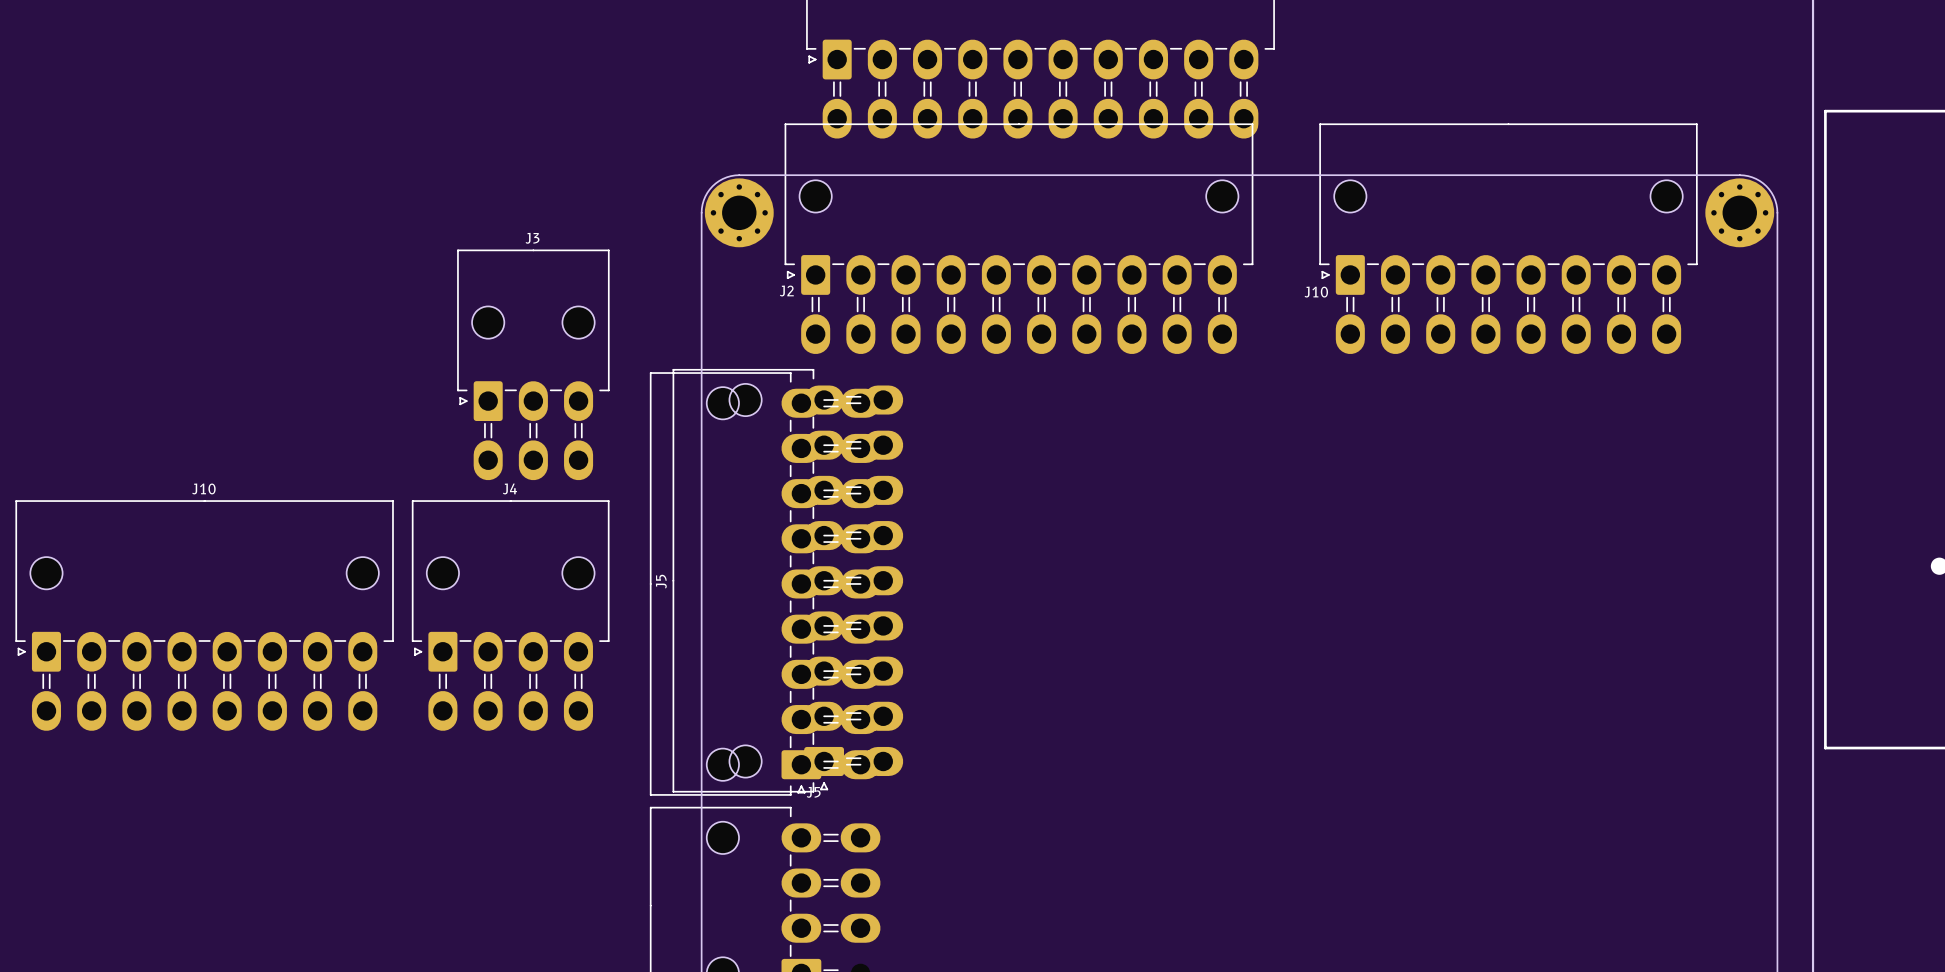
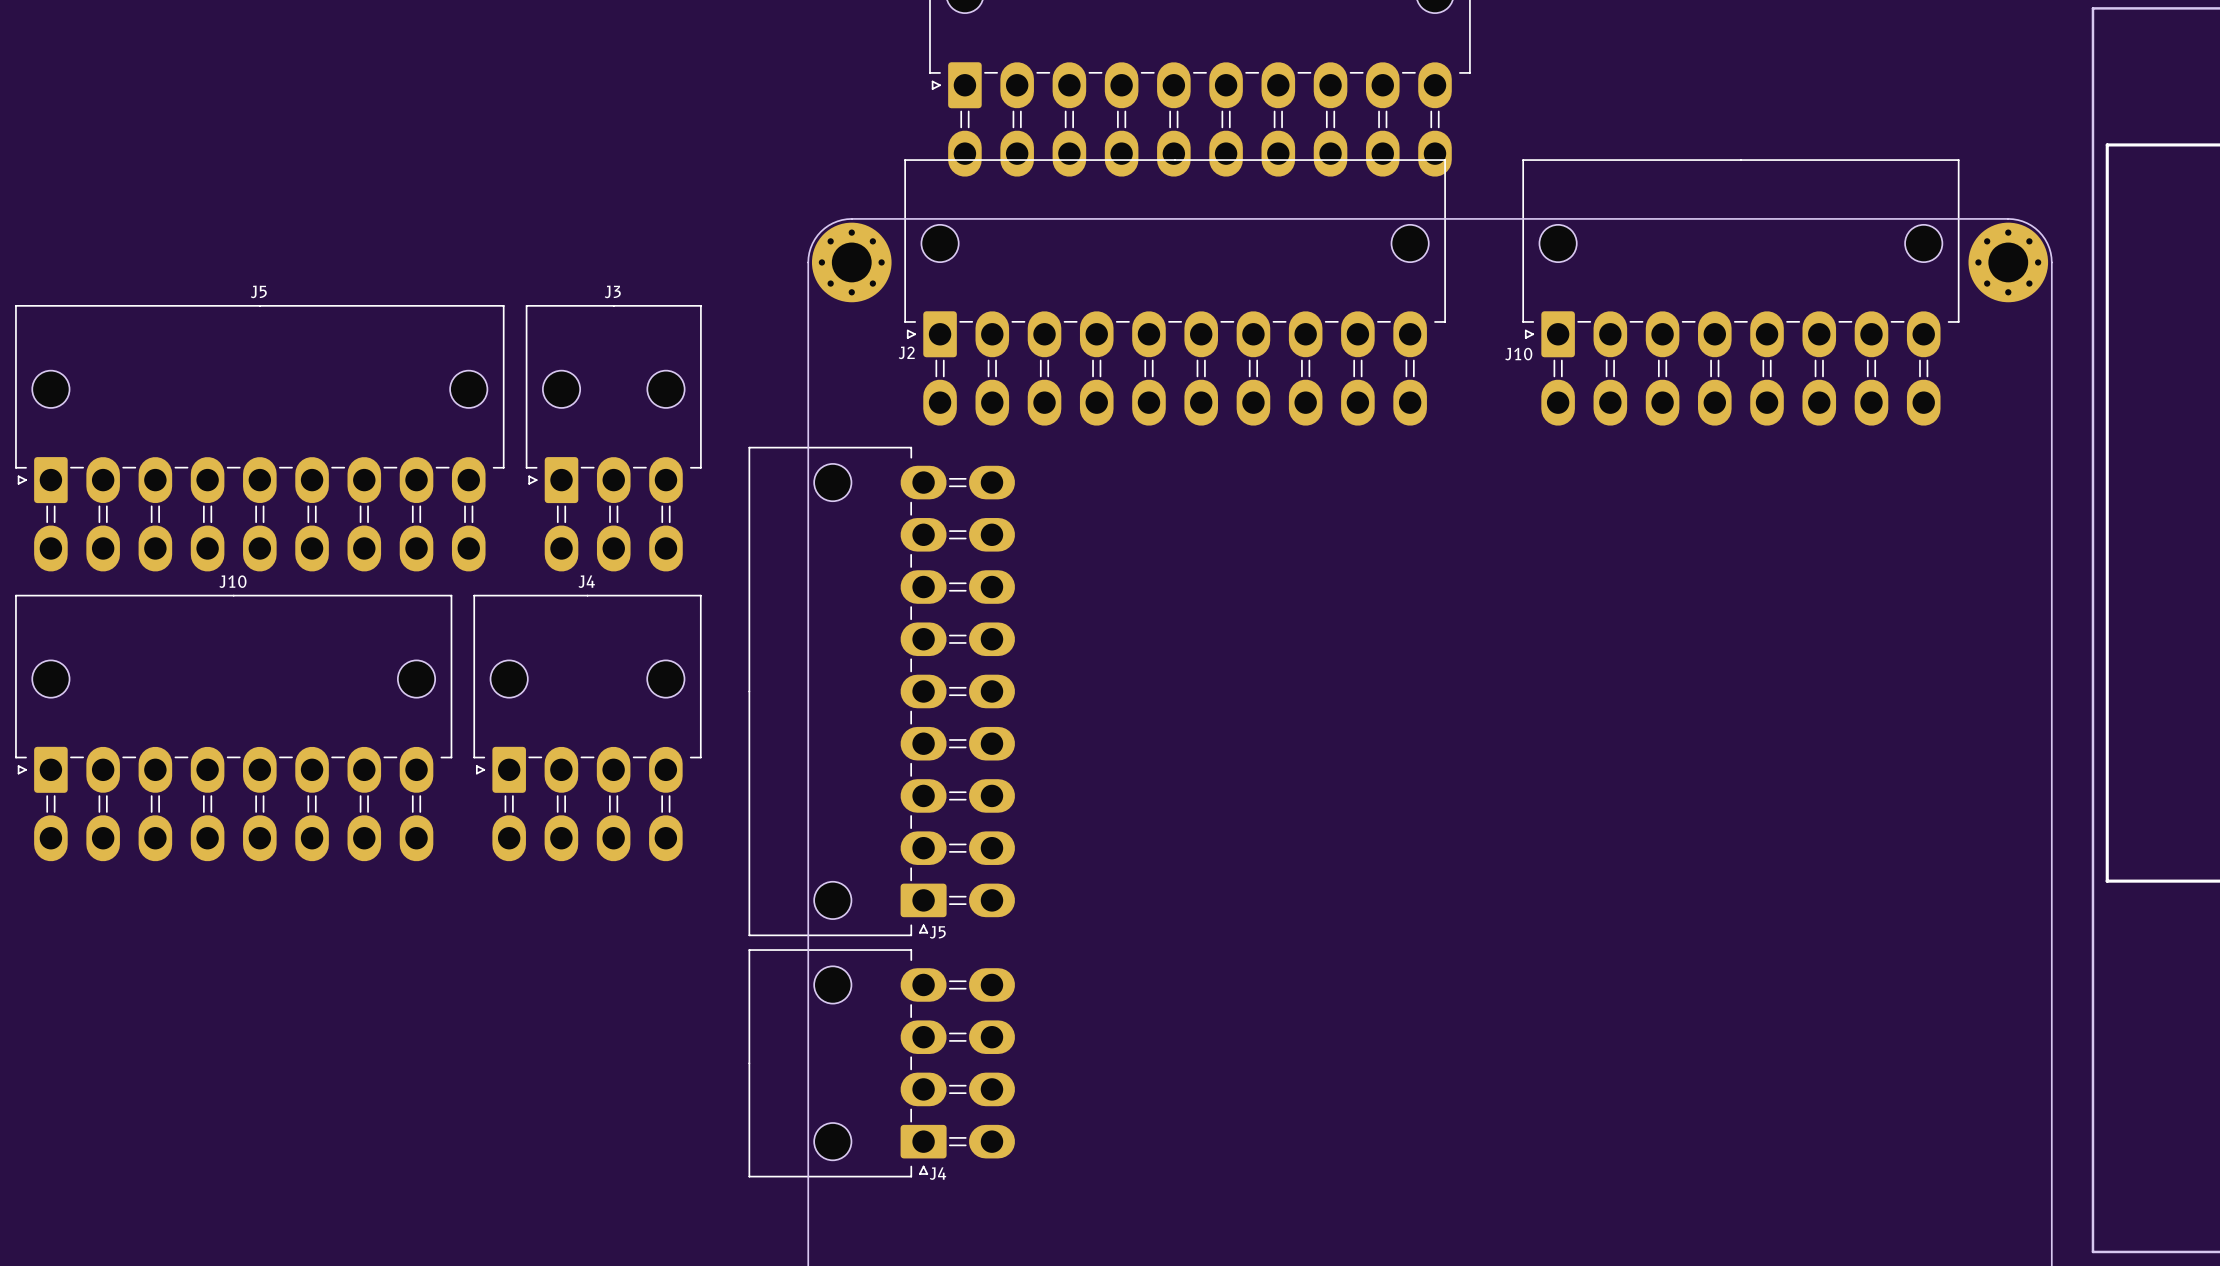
J5: none -> (259, 438)
J5: (787, 580) -> none

